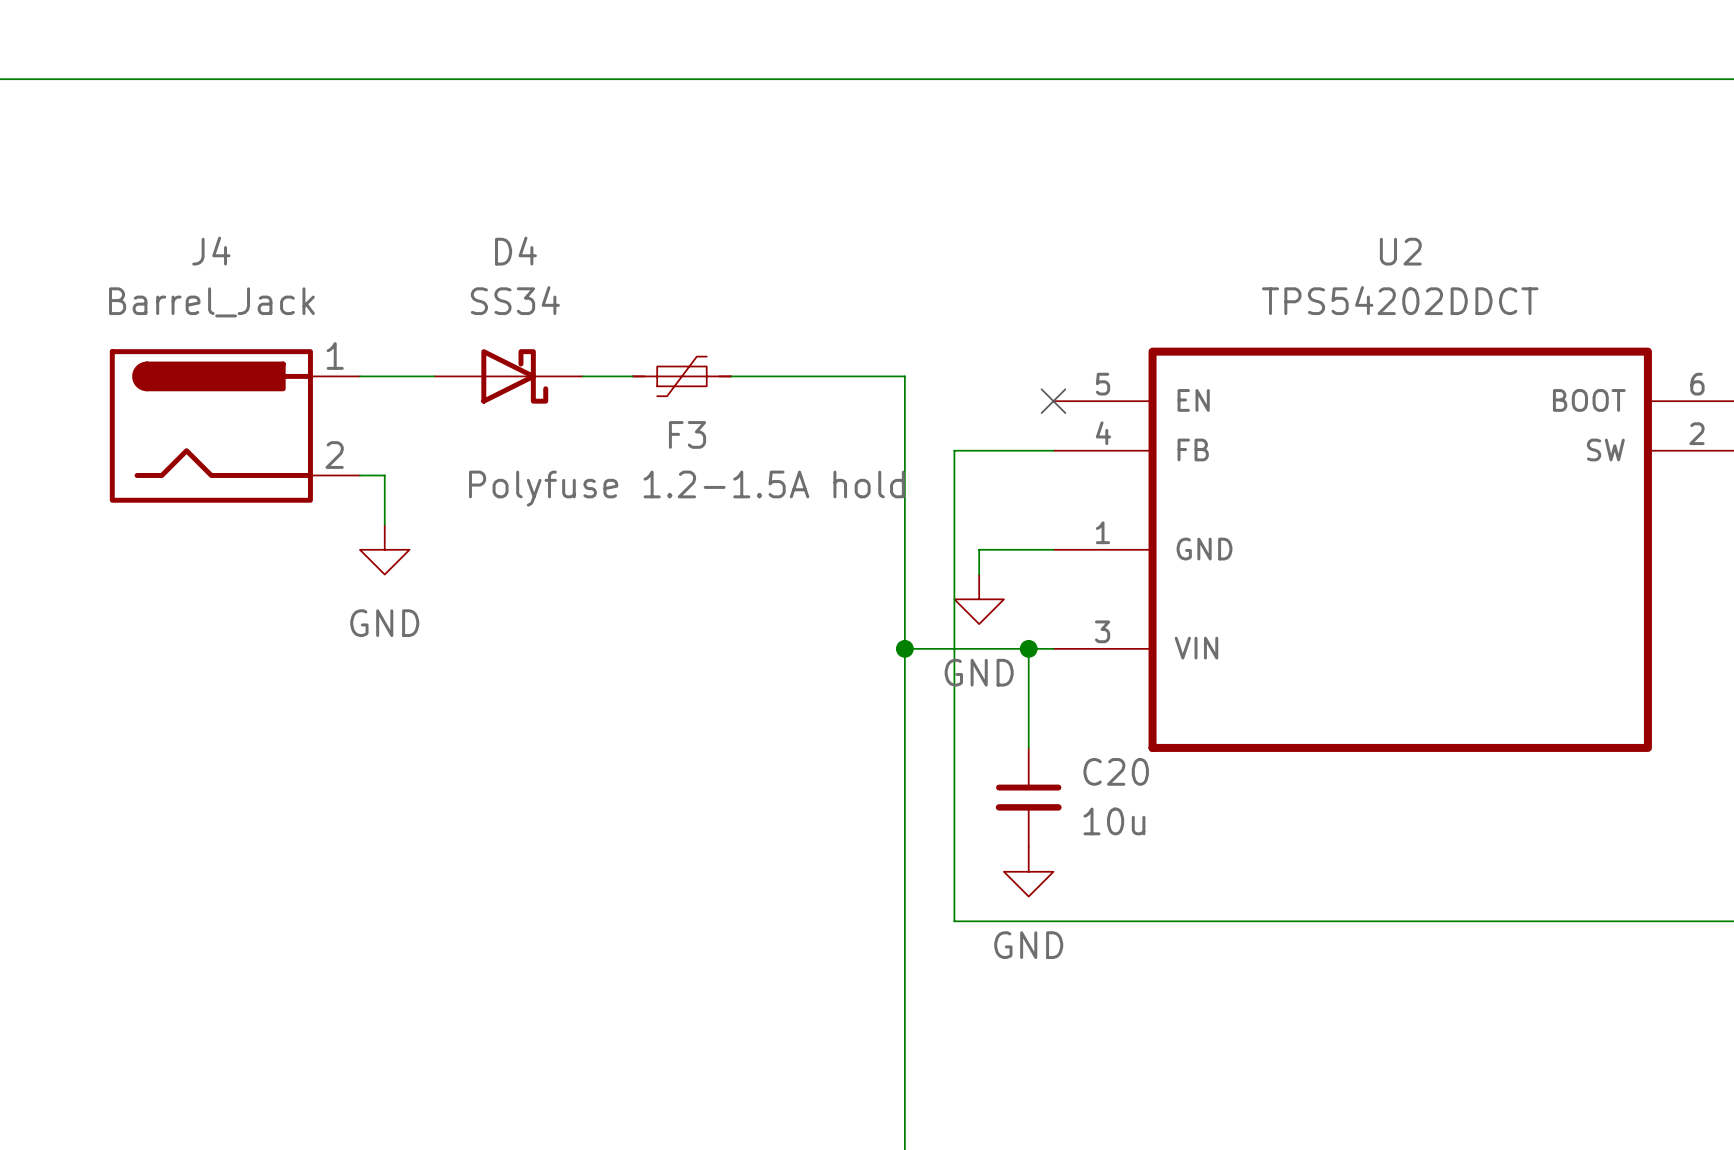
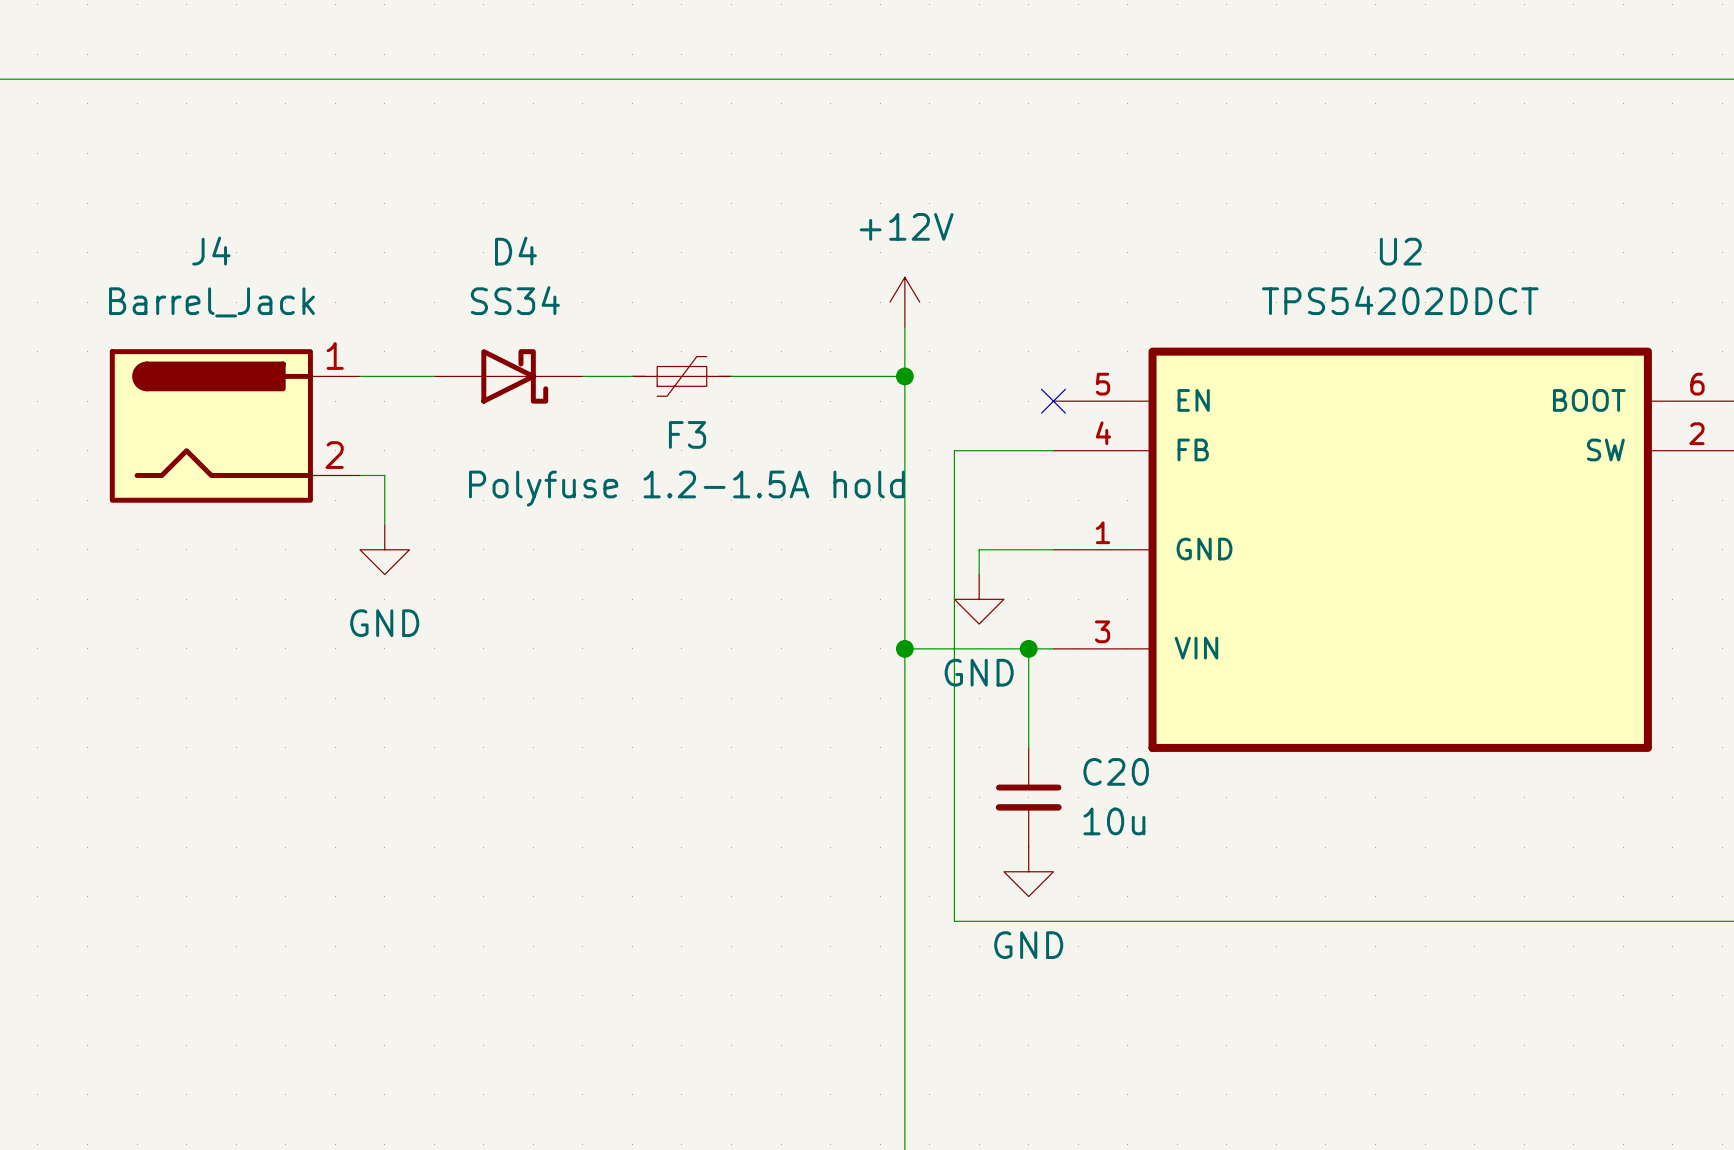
power symbol: none -> +12V (904, 302)
wire: none -> (904, 326) (904, 376)
junction: none -> (904, 376)

